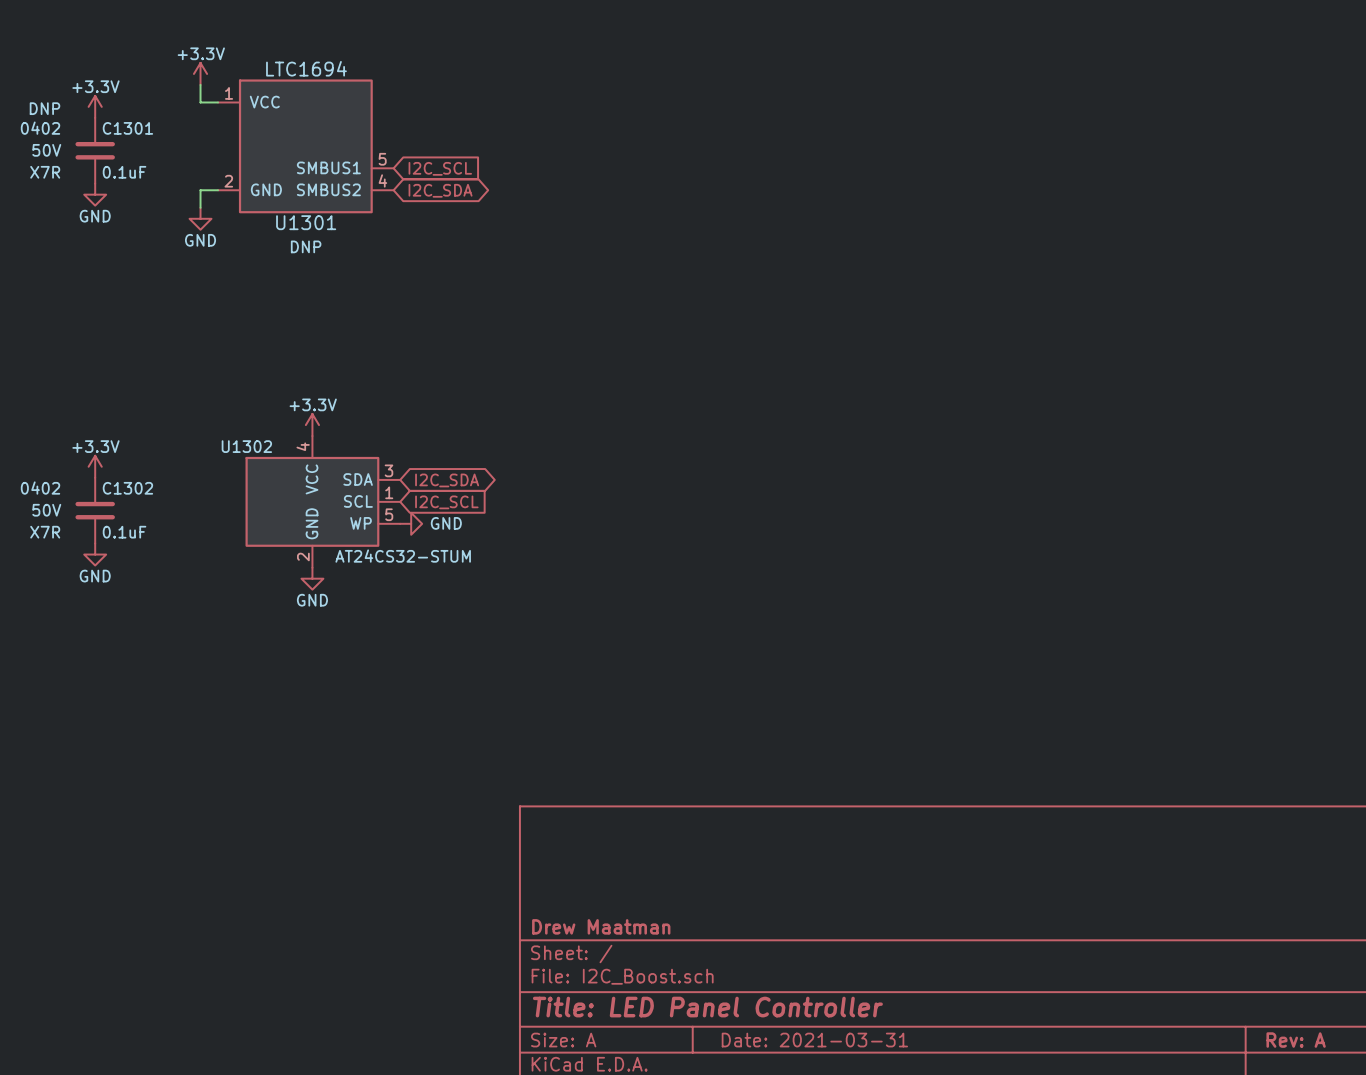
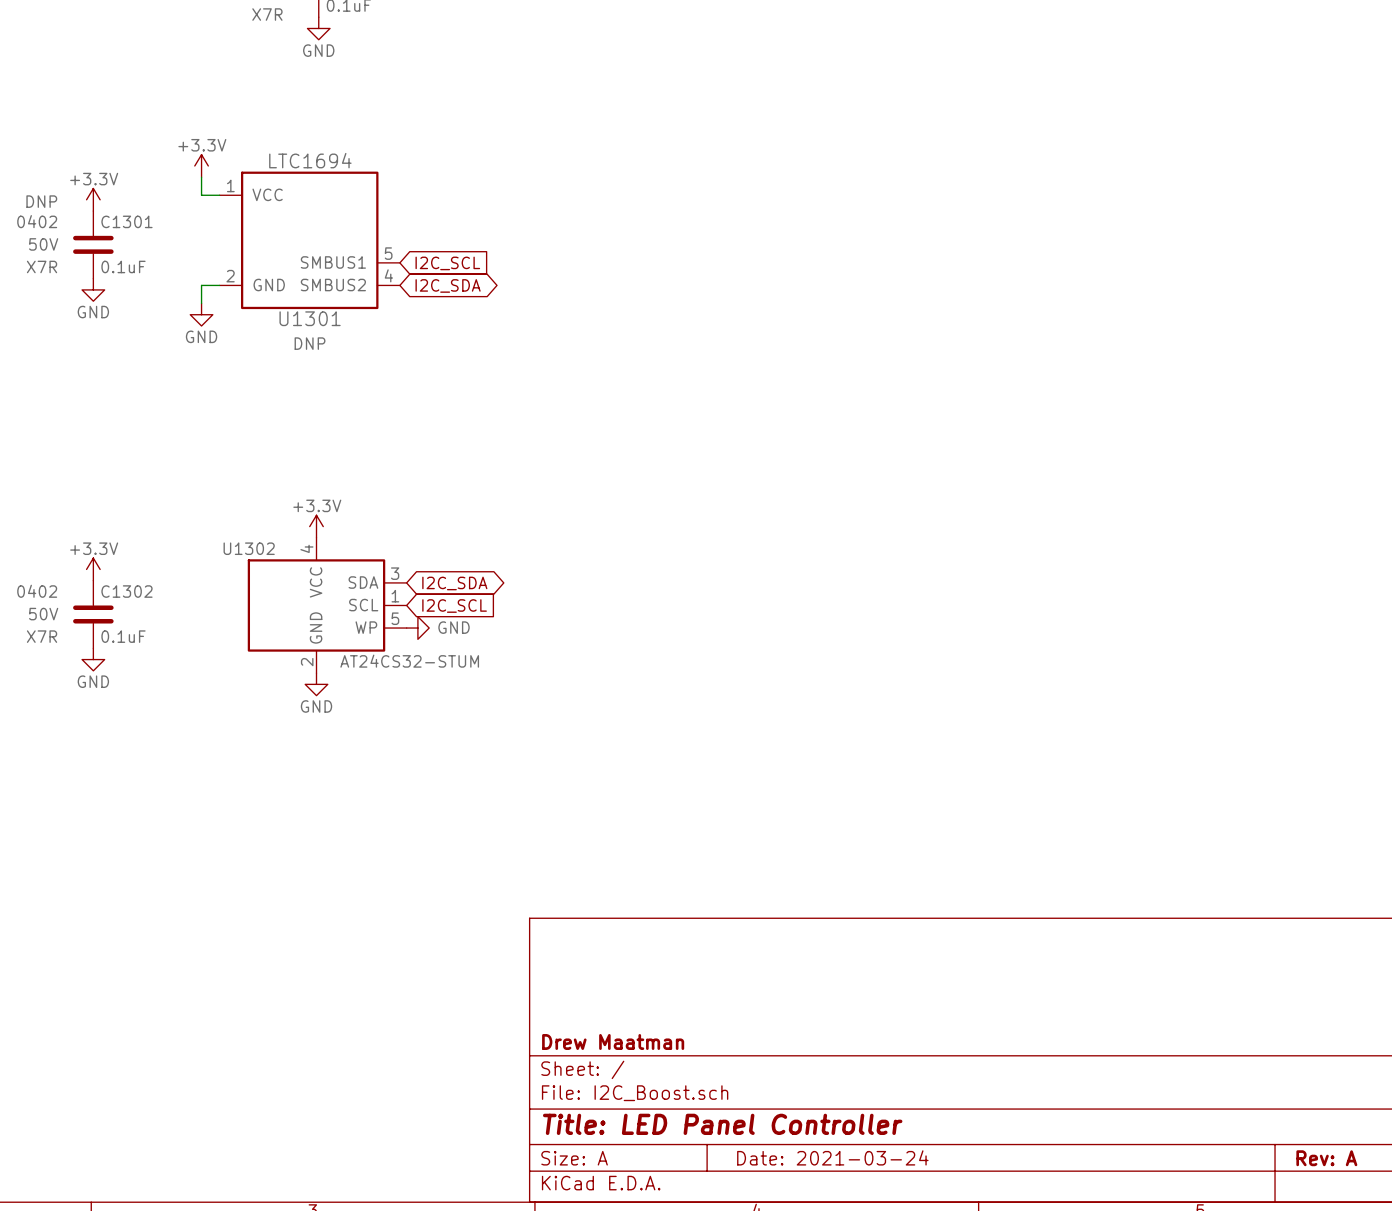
title block: Date: 2021-03-31 (814, 1040) -> Date: 2021-03-24 (832, 1157)

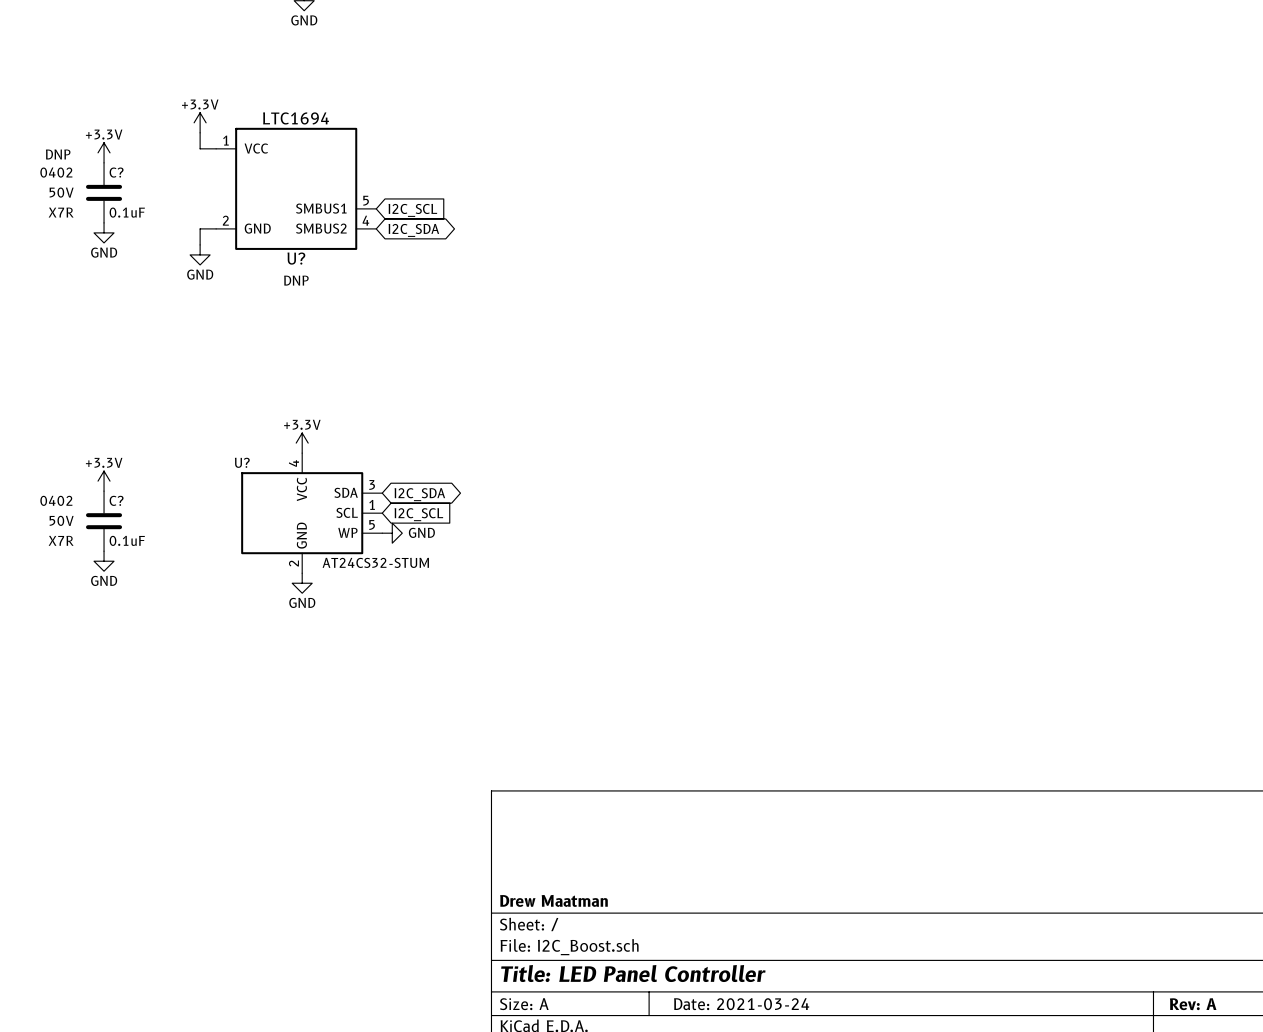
C1301 name: C1301 (126, 221) -> C? (116, 172)
U1301 name: U1301 (310, 318) -> U? (296, 258)
U1302 name: U1302 (249, 548) -> U? (242, 462)
C1302 name: C1302 (126, 591) -> C? (116, 500)

